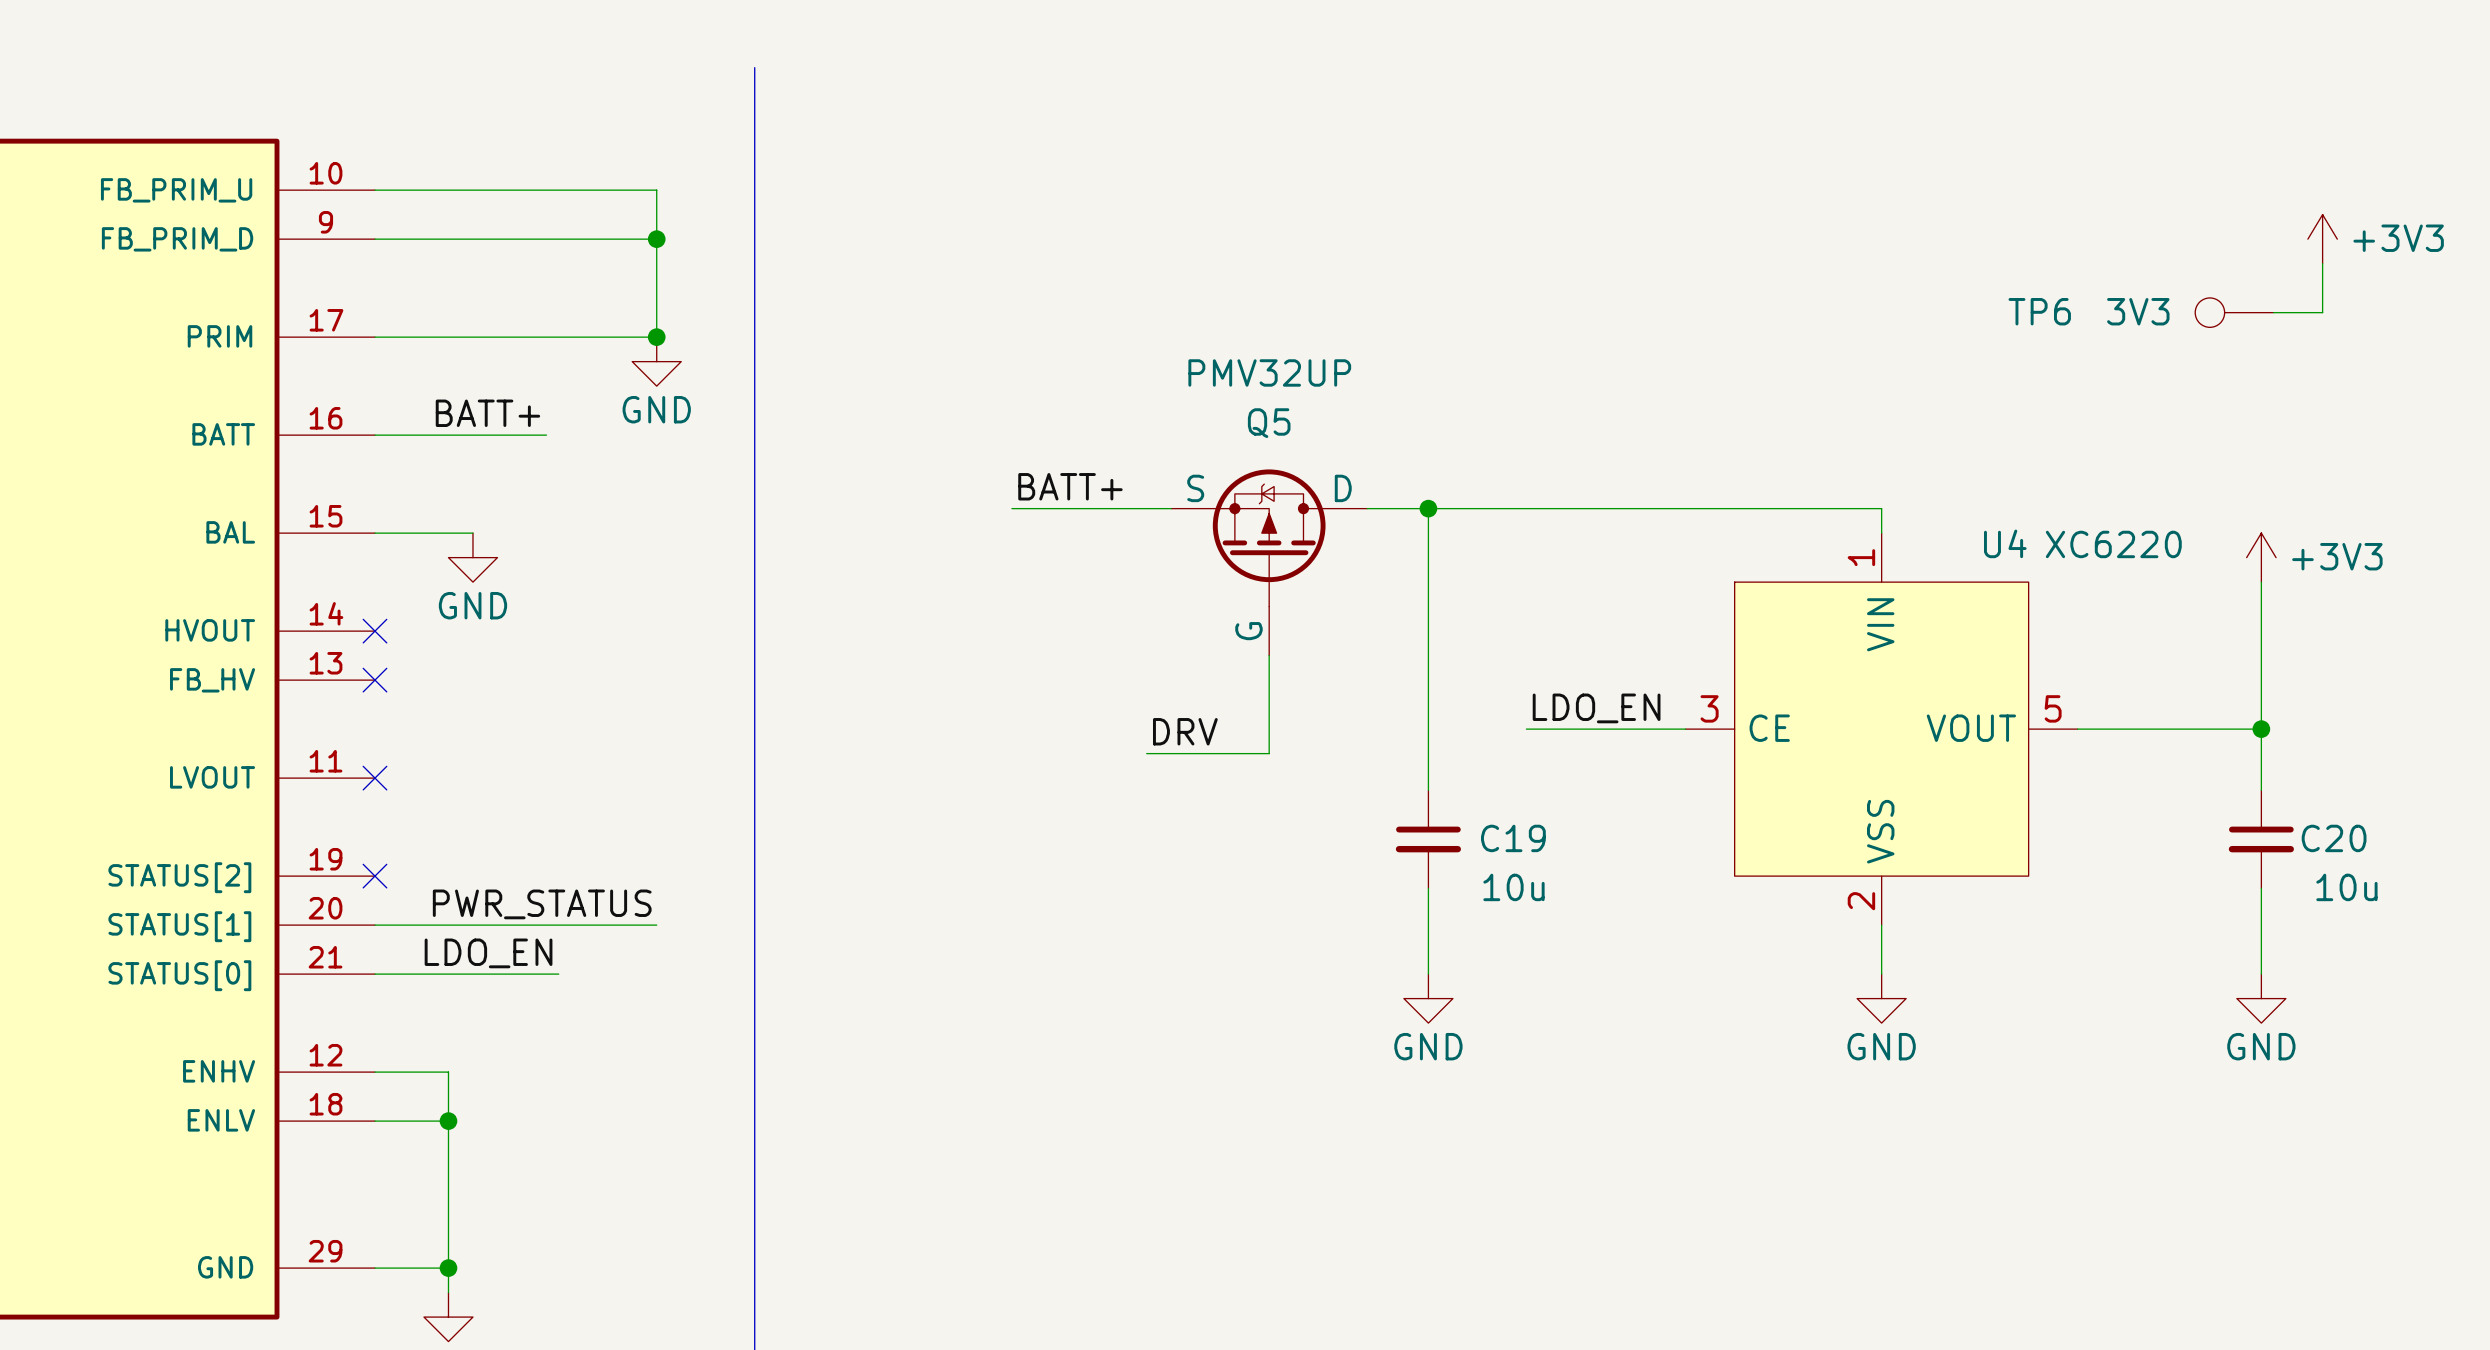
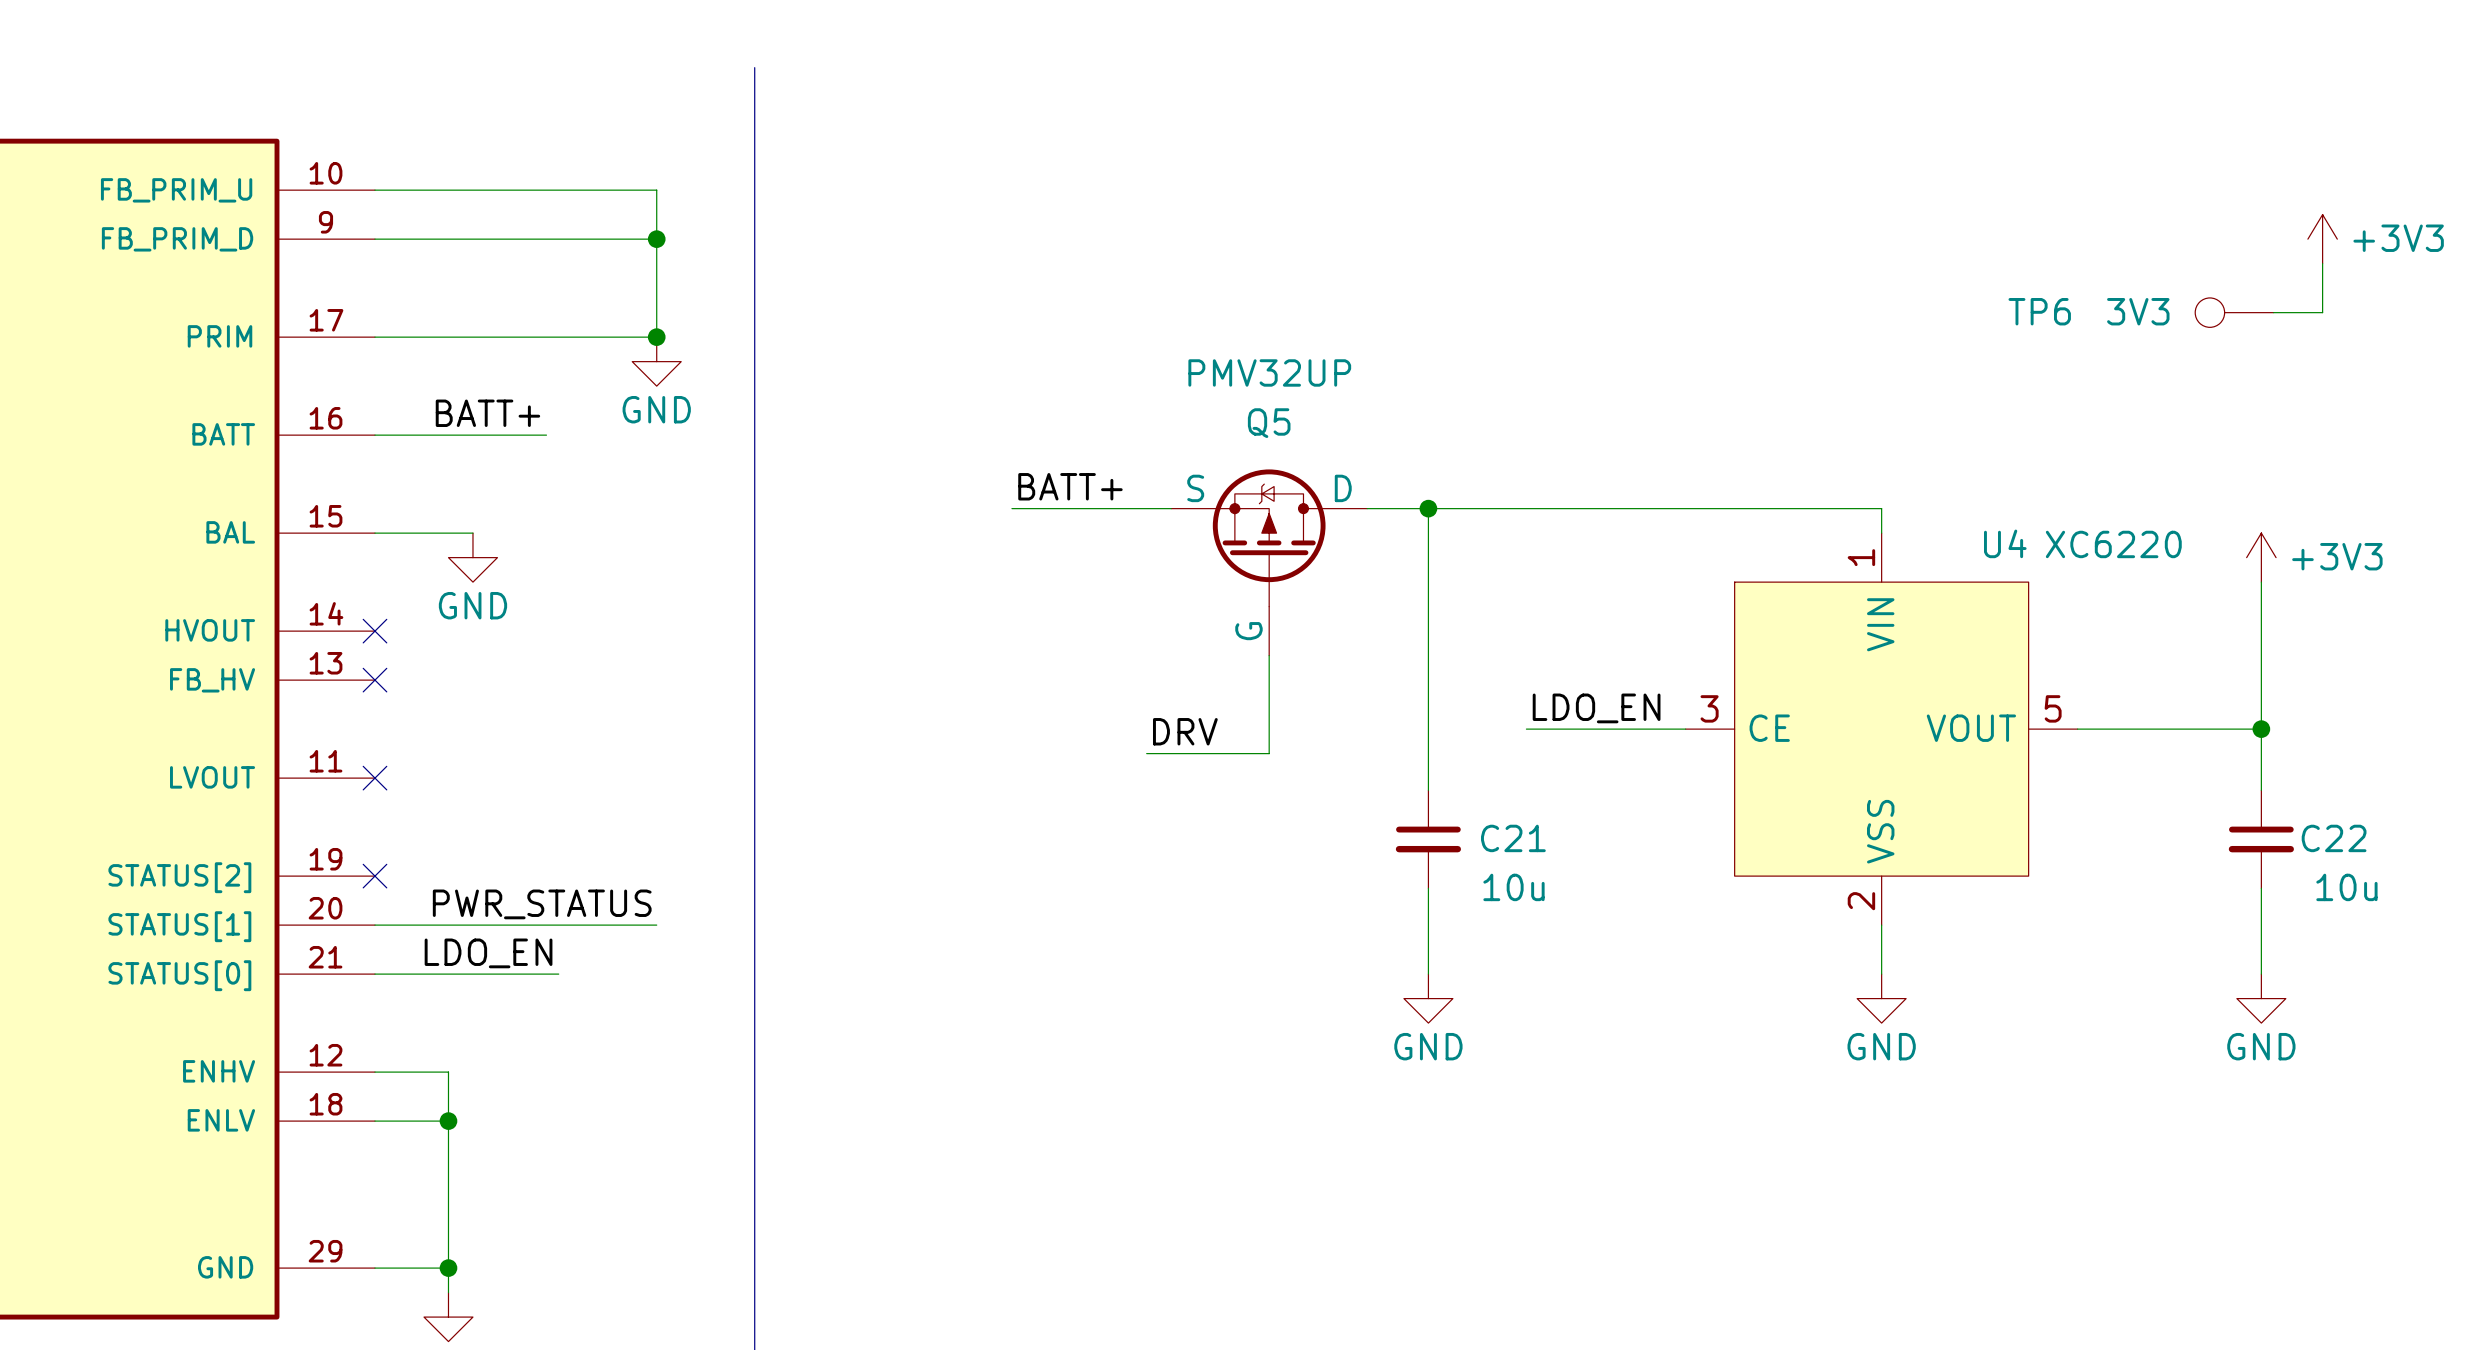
C19 name: C19 (1513, 838) -> C21 (1513, 838)
C20 name: C20 (2334, 838) -> C22 (2334, 838)

